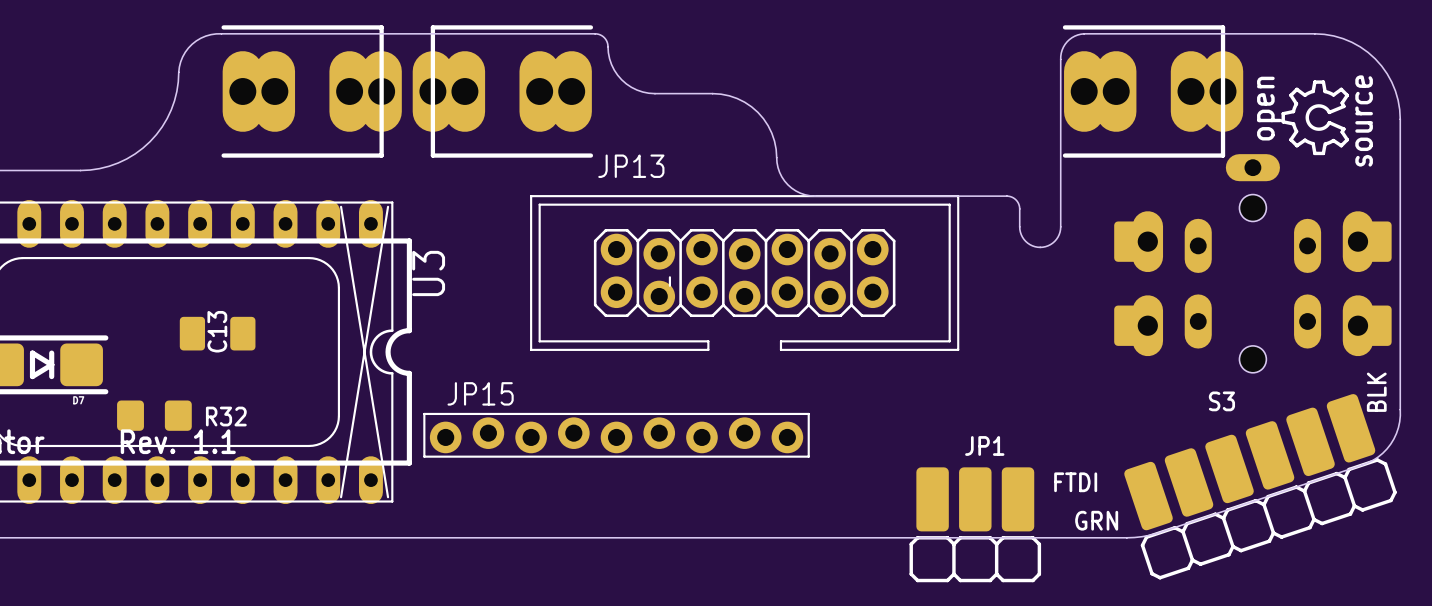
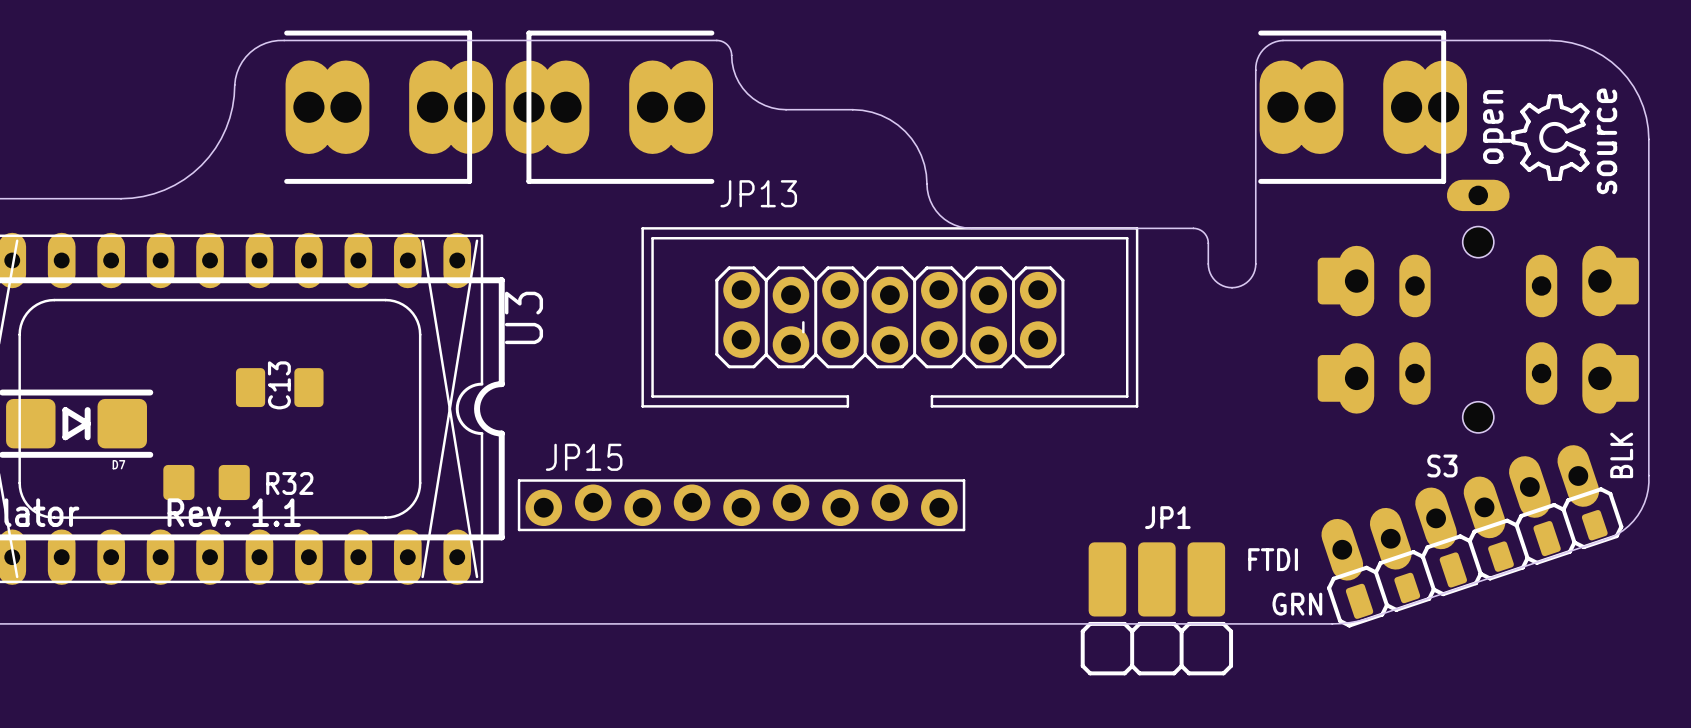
part: none -> (1472, 536)
part: (1260, 486) -> none

